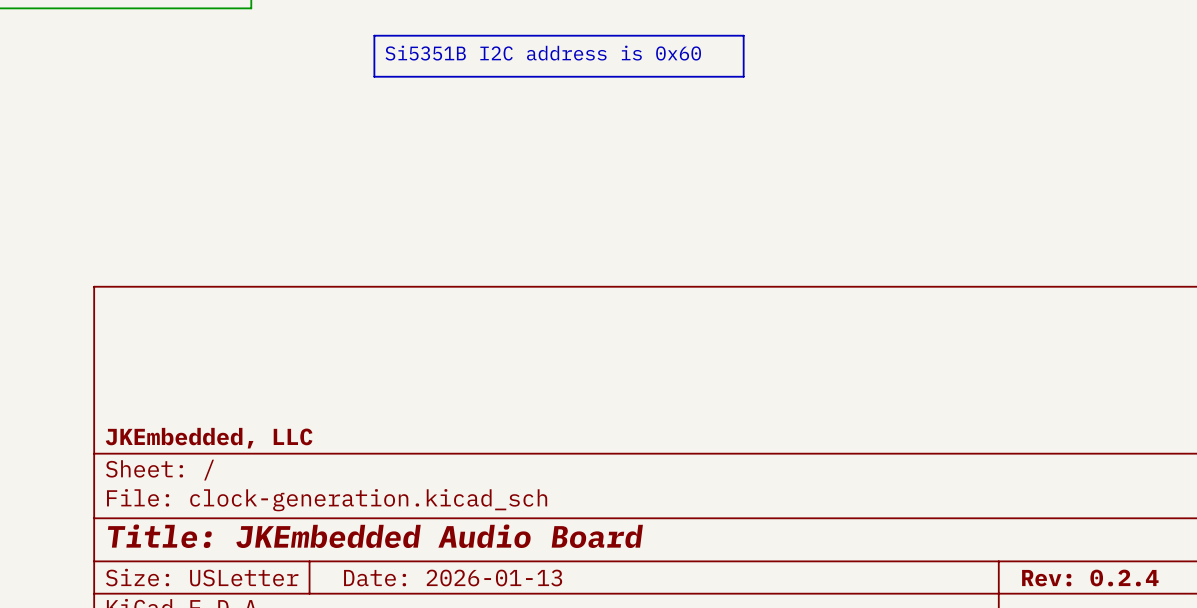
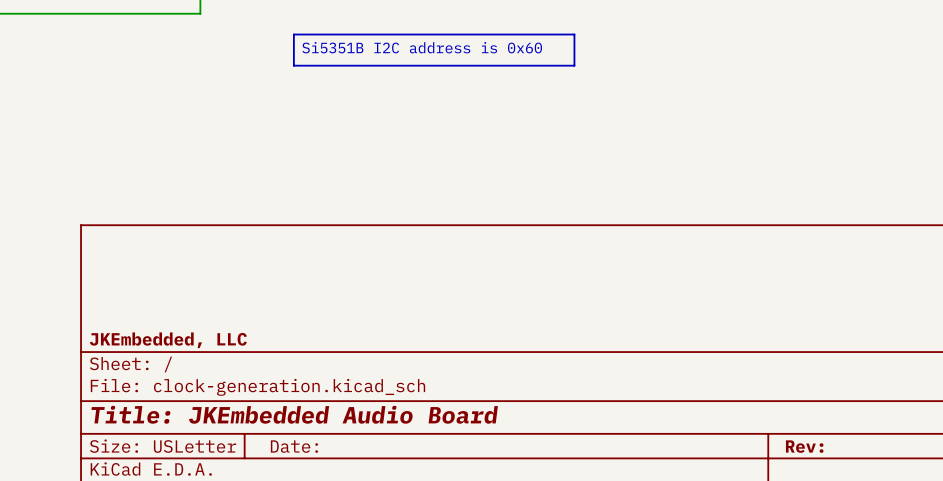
title block: Date: 2026-01-13 (453, 578) -> Date: (294, 446)
title block: Rev: 0.2.4 (1090, 578) -> Rev: (804, 446)

